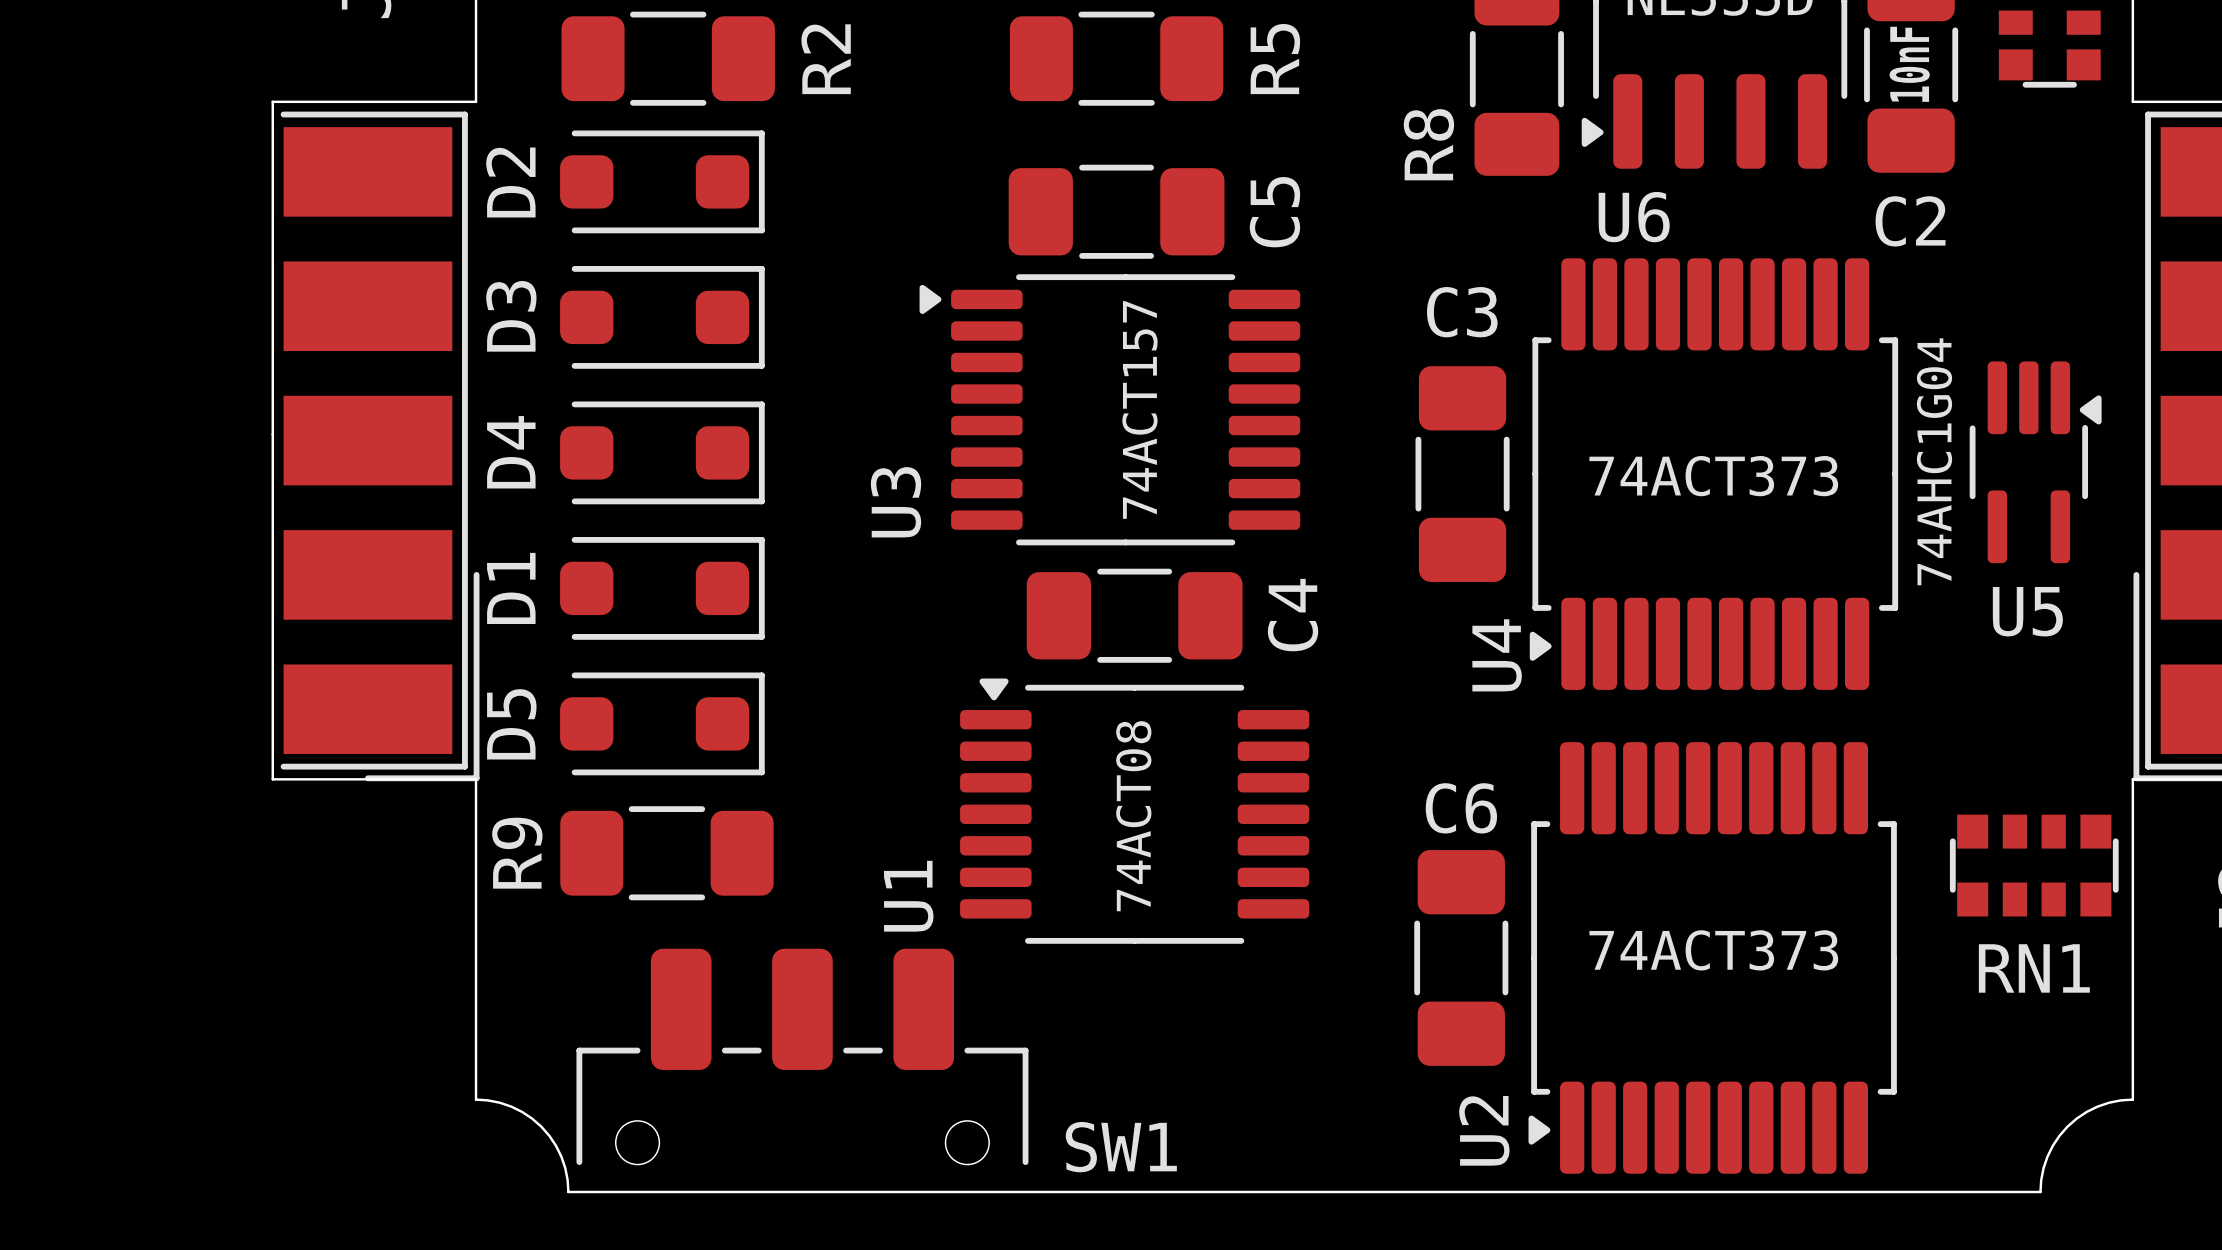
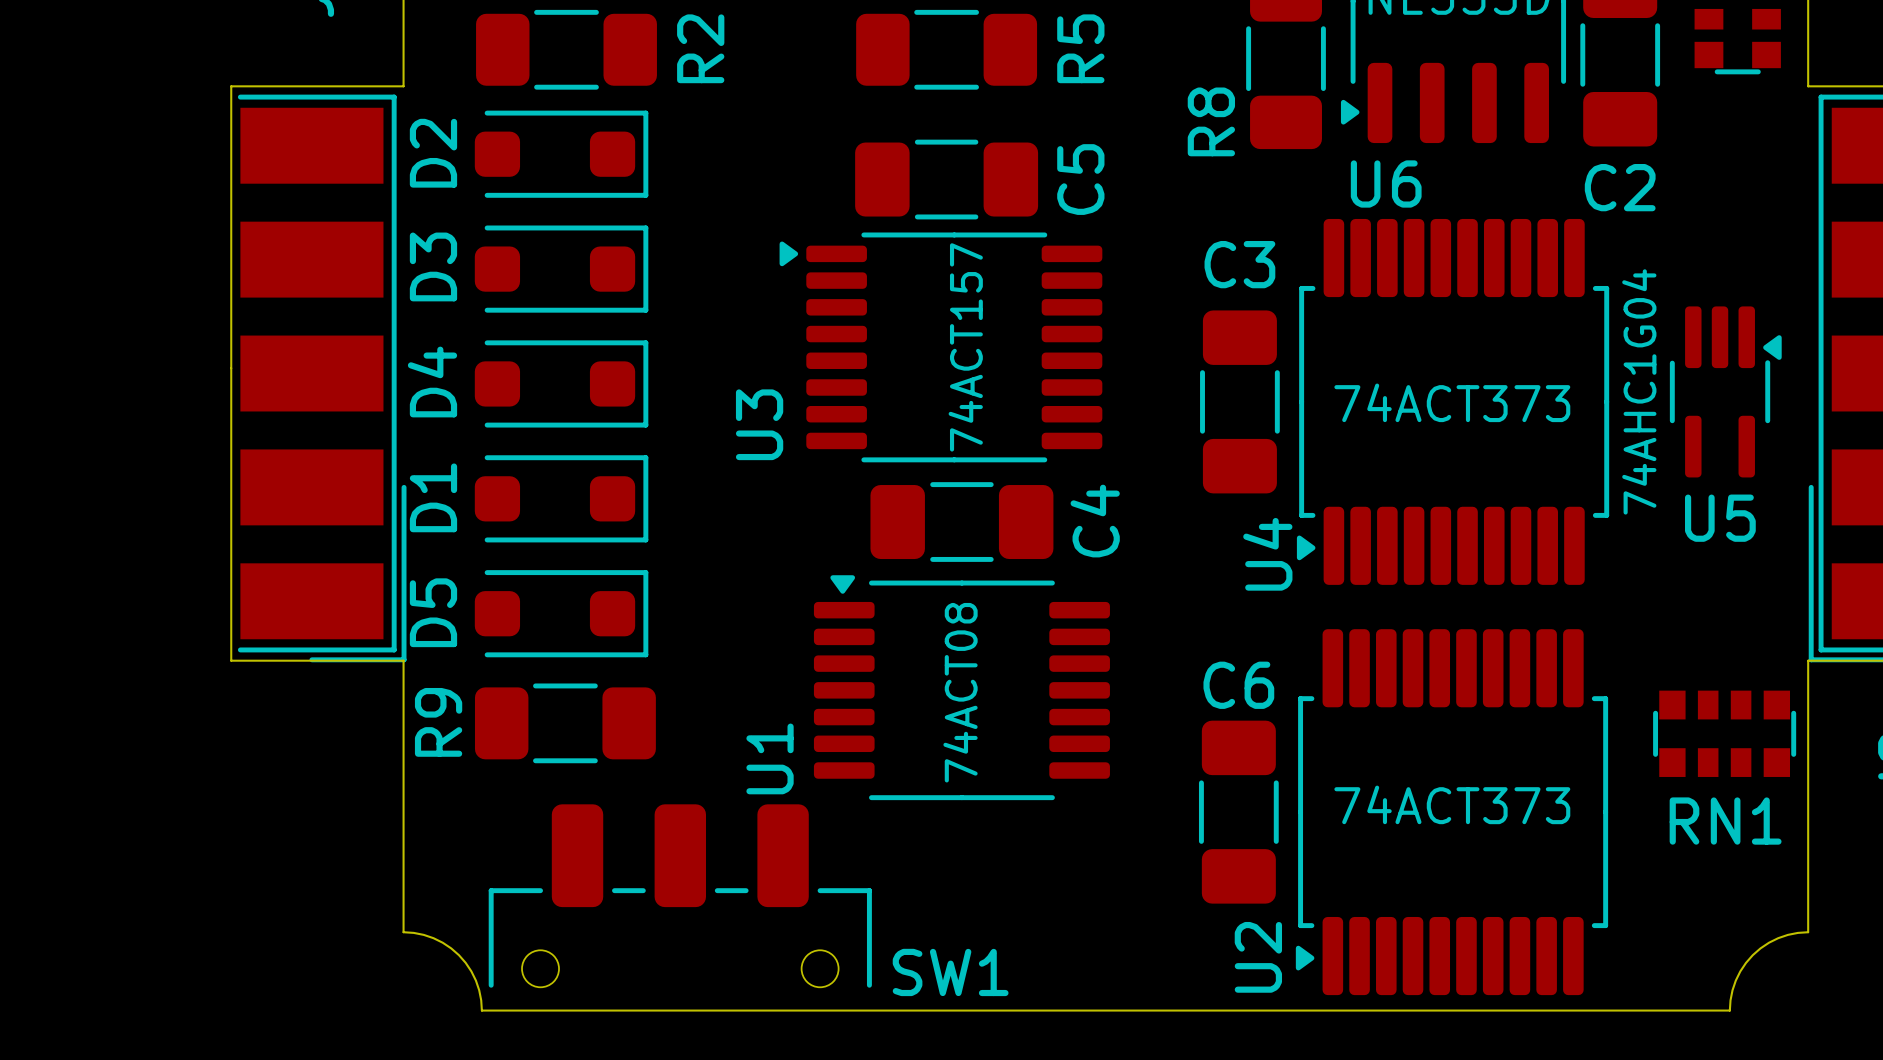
C2 value: 10nF (1909, 64) -> none

